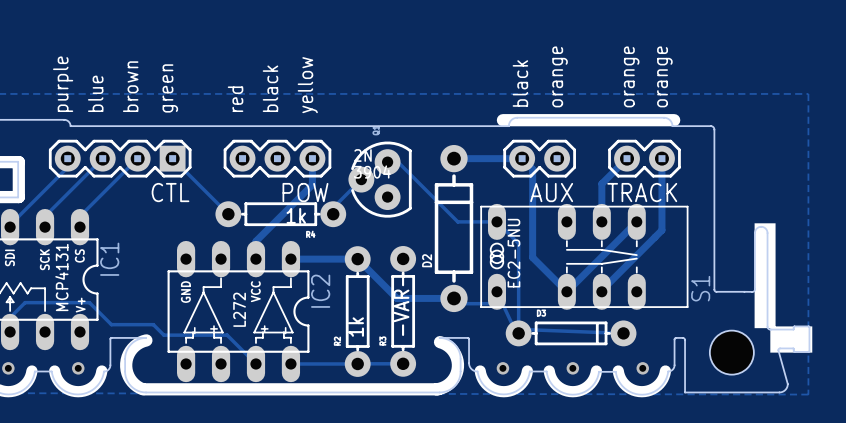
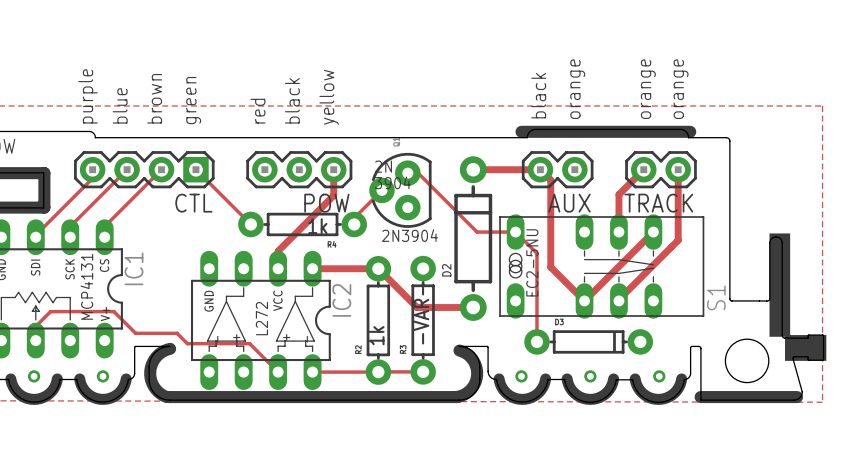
text: none -> 2N3904 (409, 235)
track: (455, 303) (502, 303) (496, 291) (514, 329) (623, 333) -> none
line: none -> (700, 397) (797, 397)

